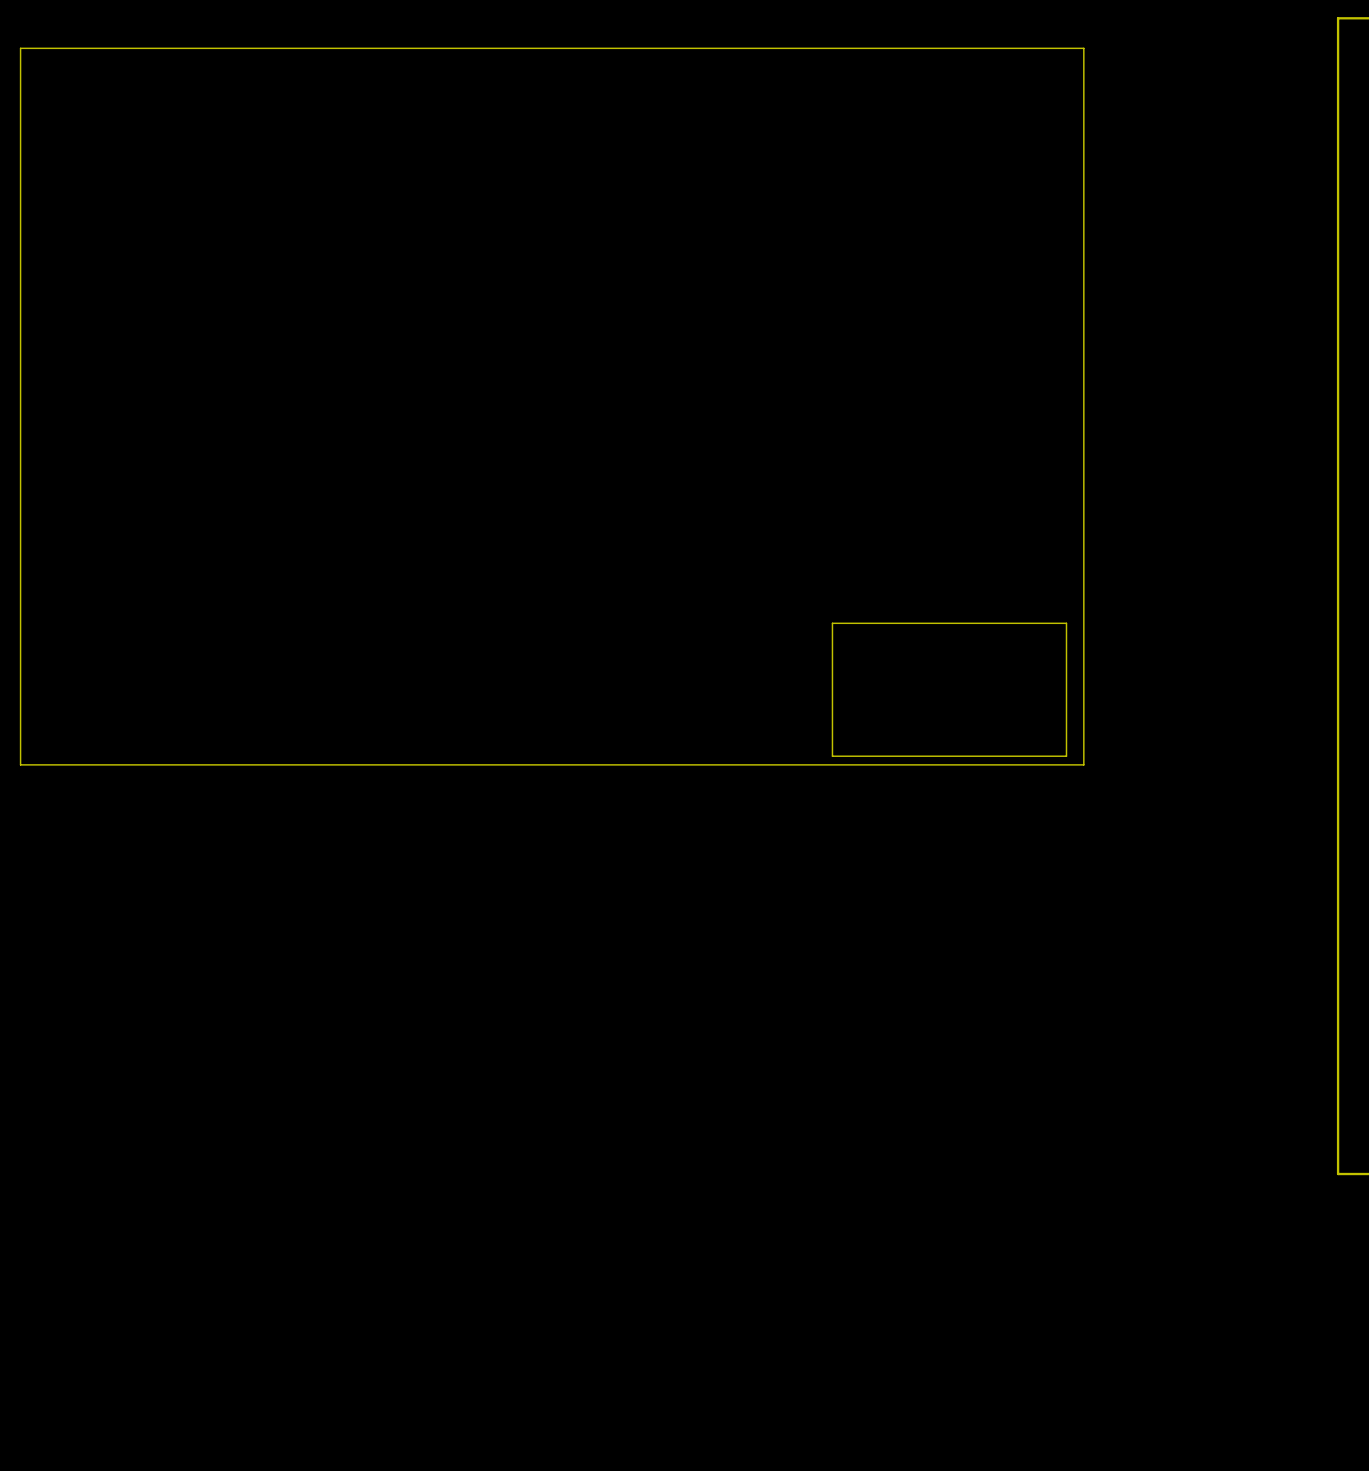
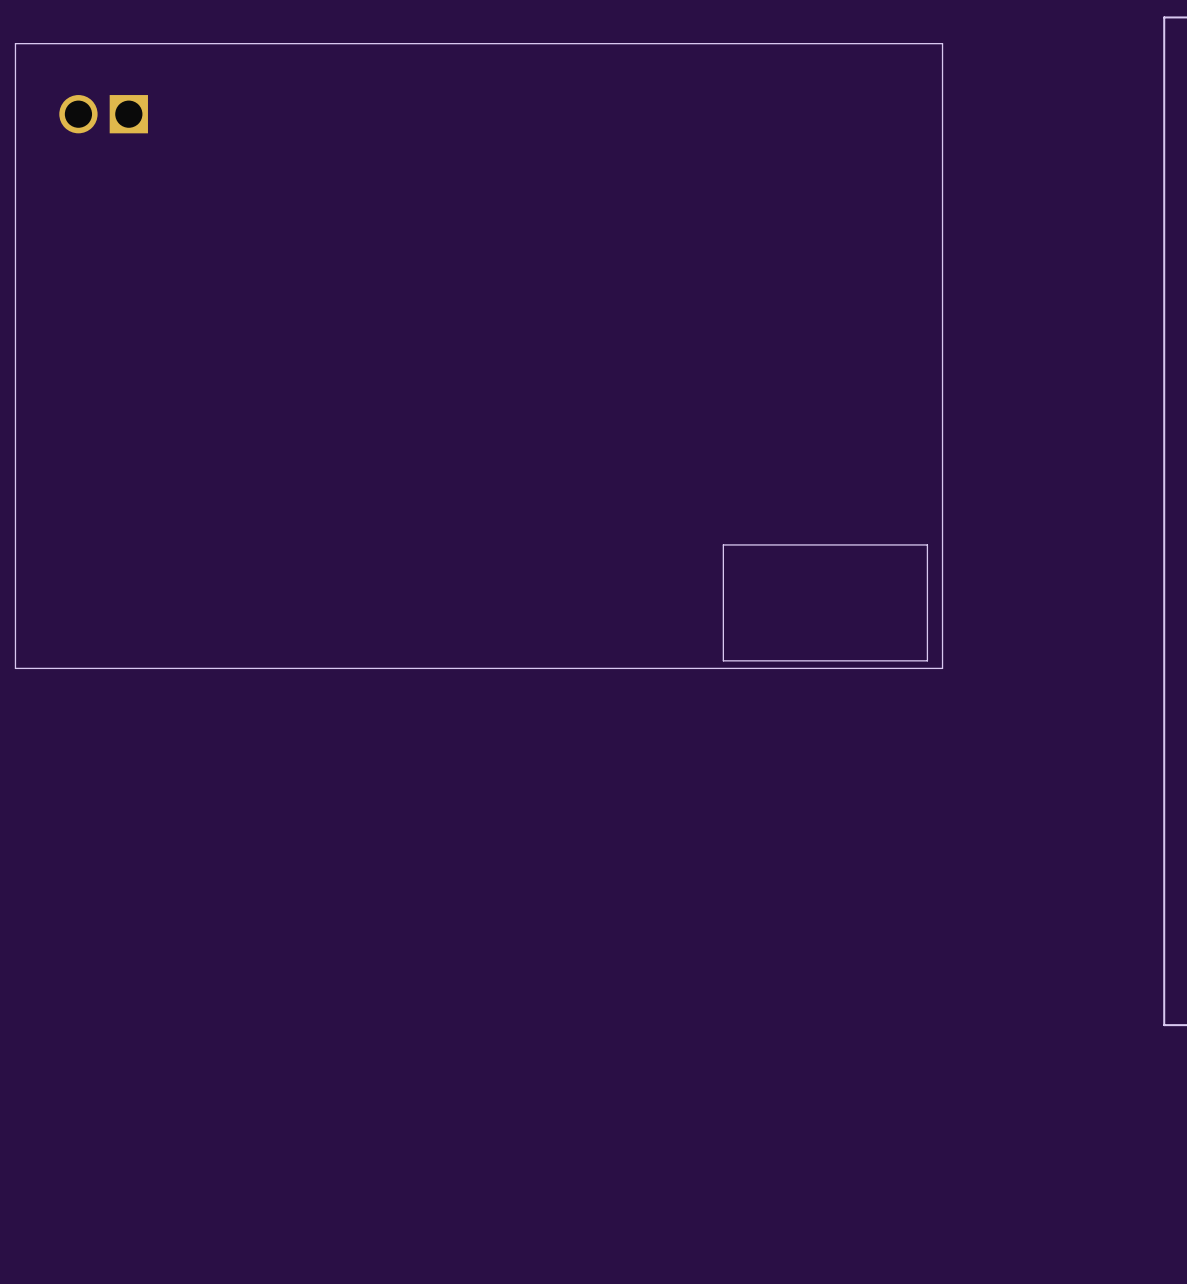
part: none -> (103, 114)

